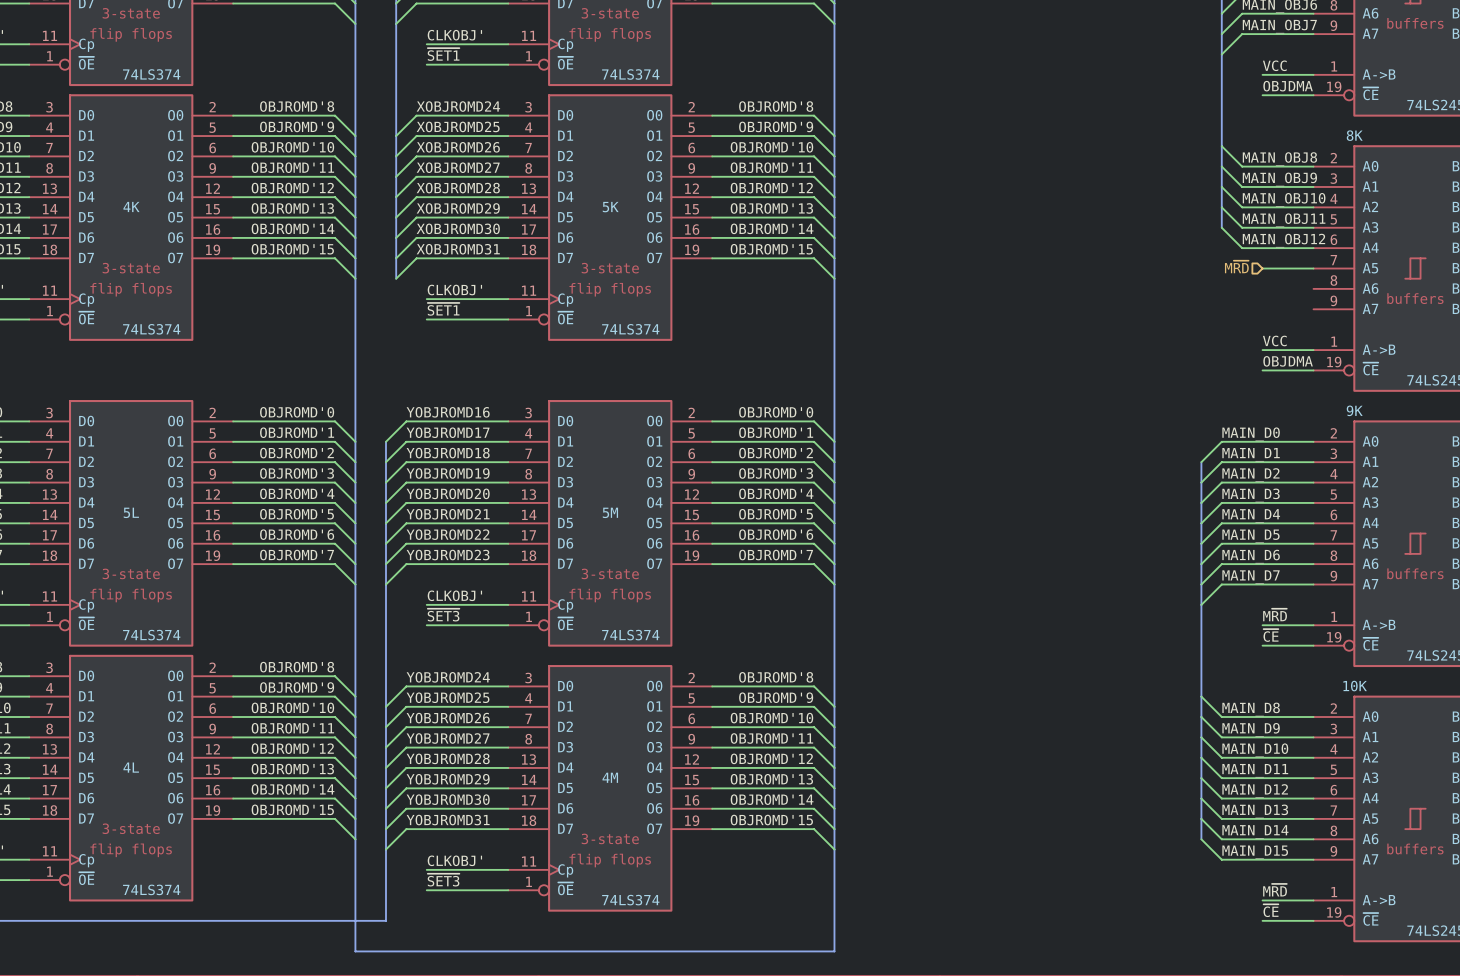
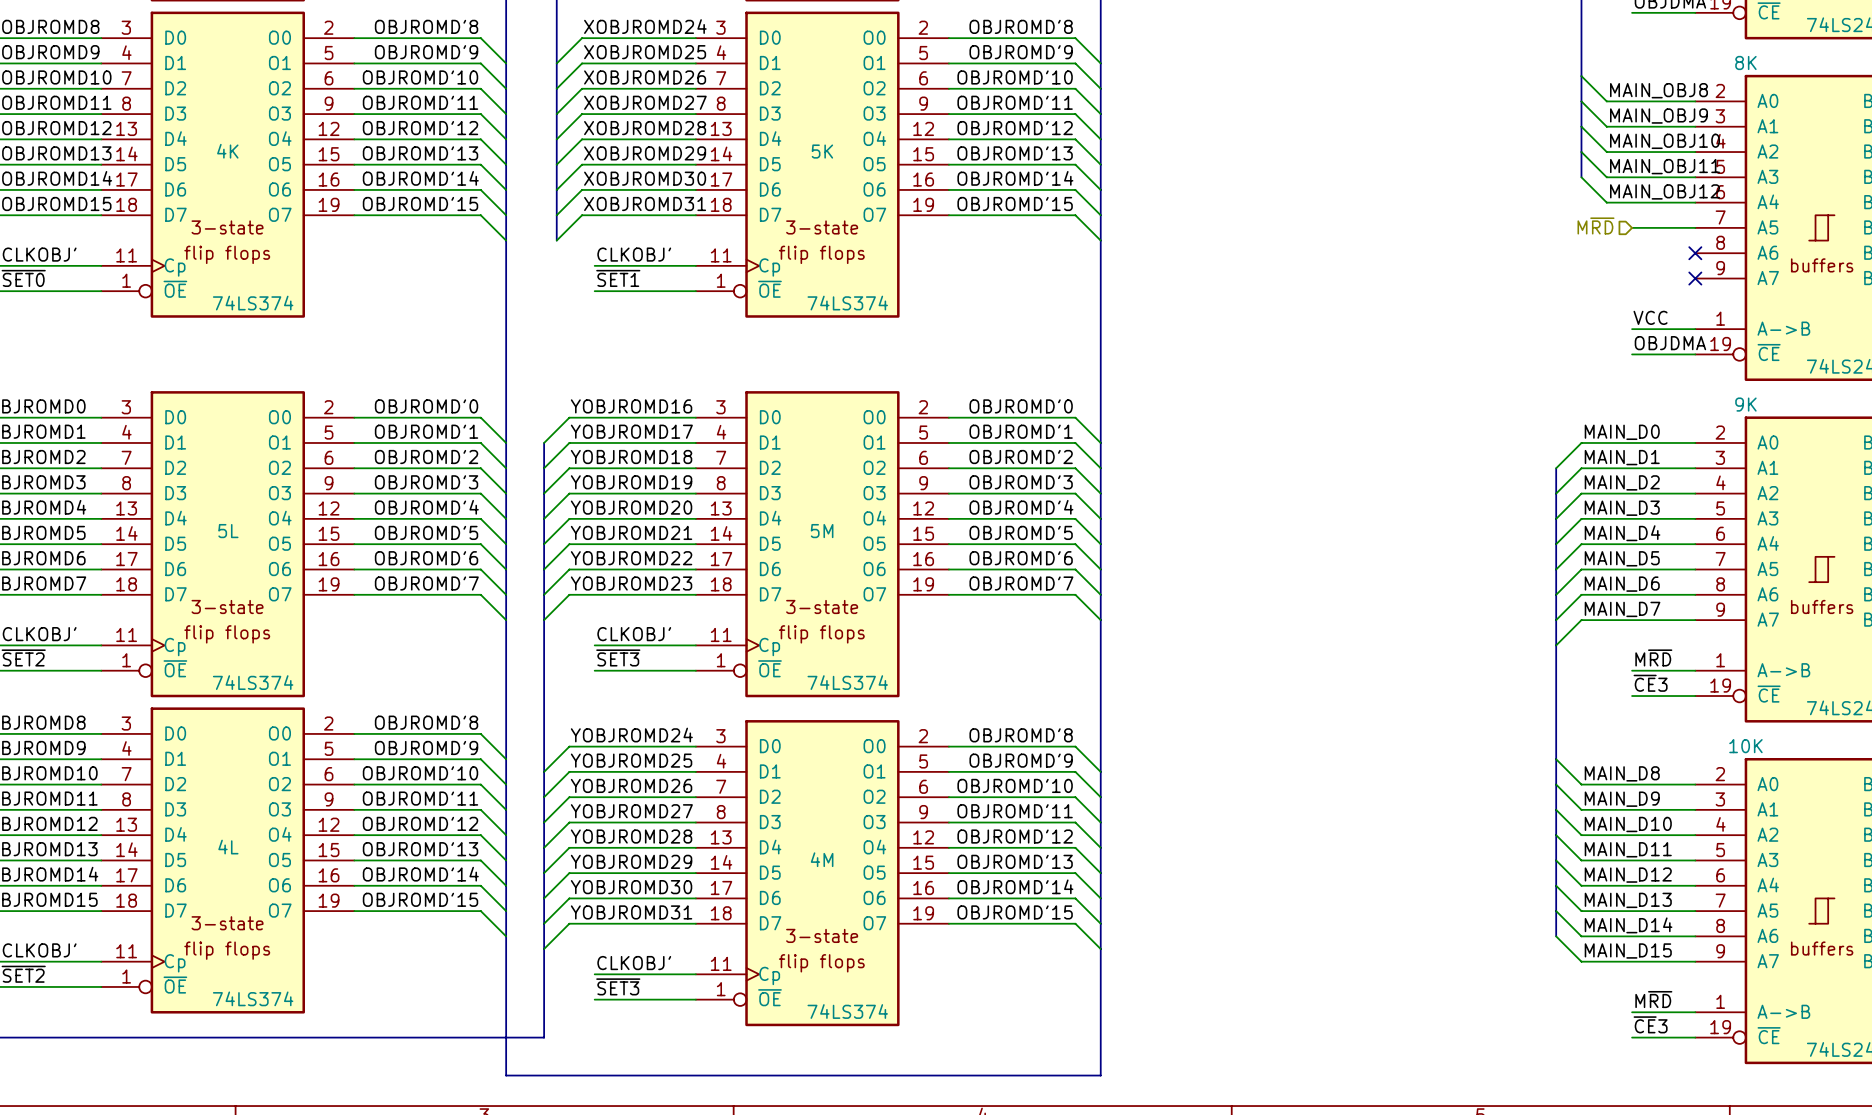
no-connect mark: none -> (1695, 253)
no-connect mark: none -> (1695, 278)
label: ~{CE} (1271, 635) -> ~{CE}3 (1650, 683)
label: ~{CE} (1271, 910) -> ~{CE}3 (1650, 1024)

